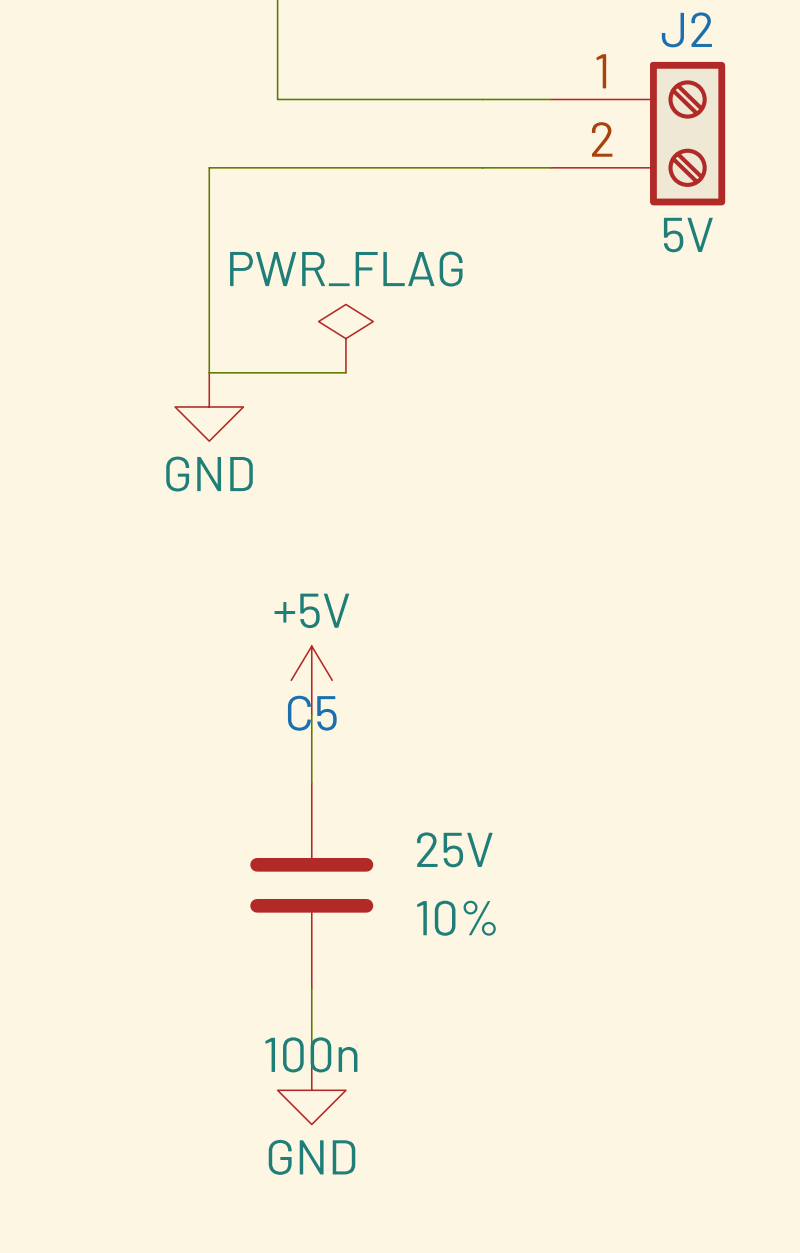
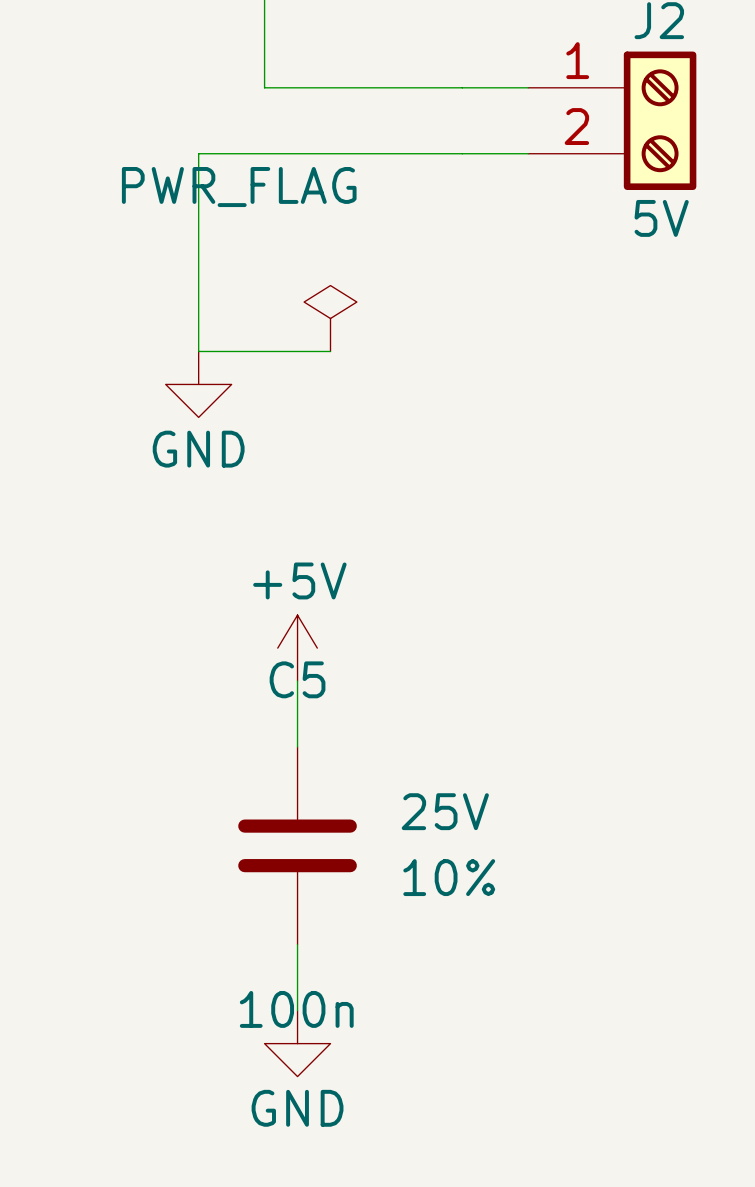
power symbol text position: PWR_FLAG (346, 269) -> PWR_FLAG (239, 187)

